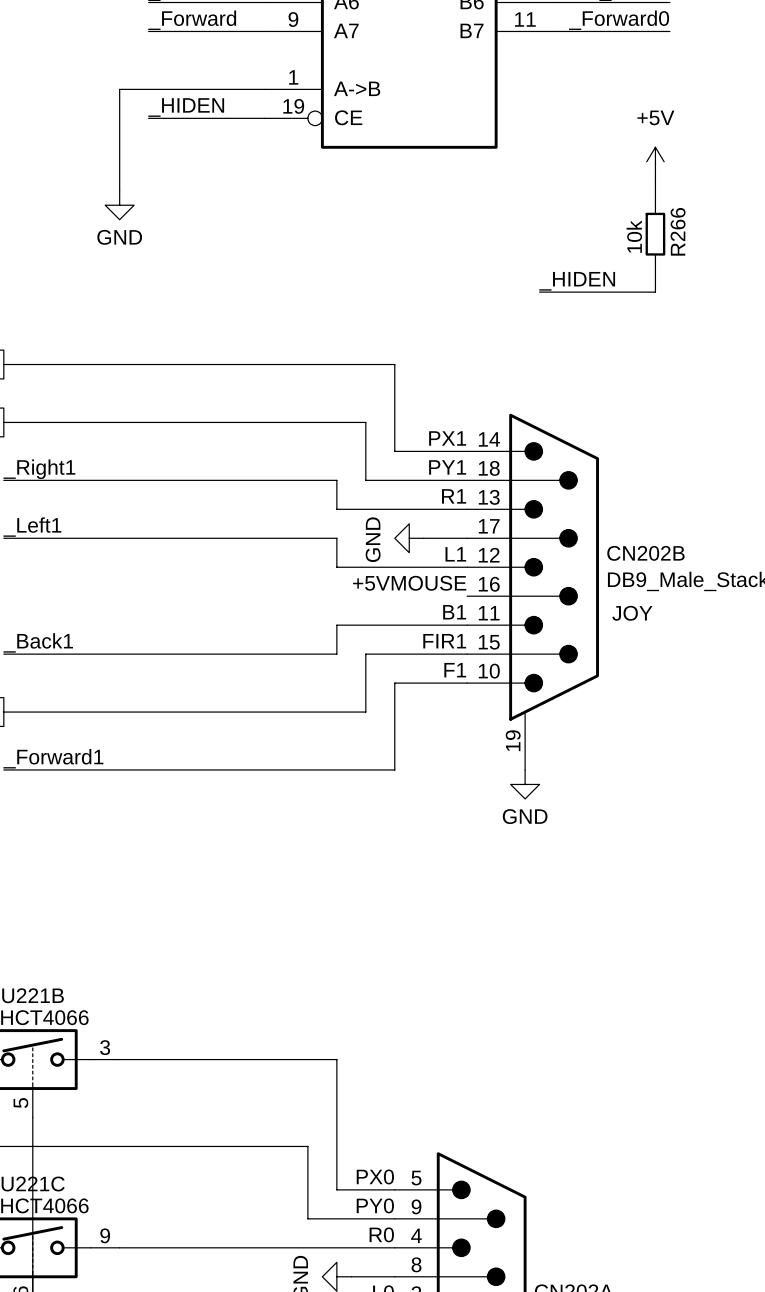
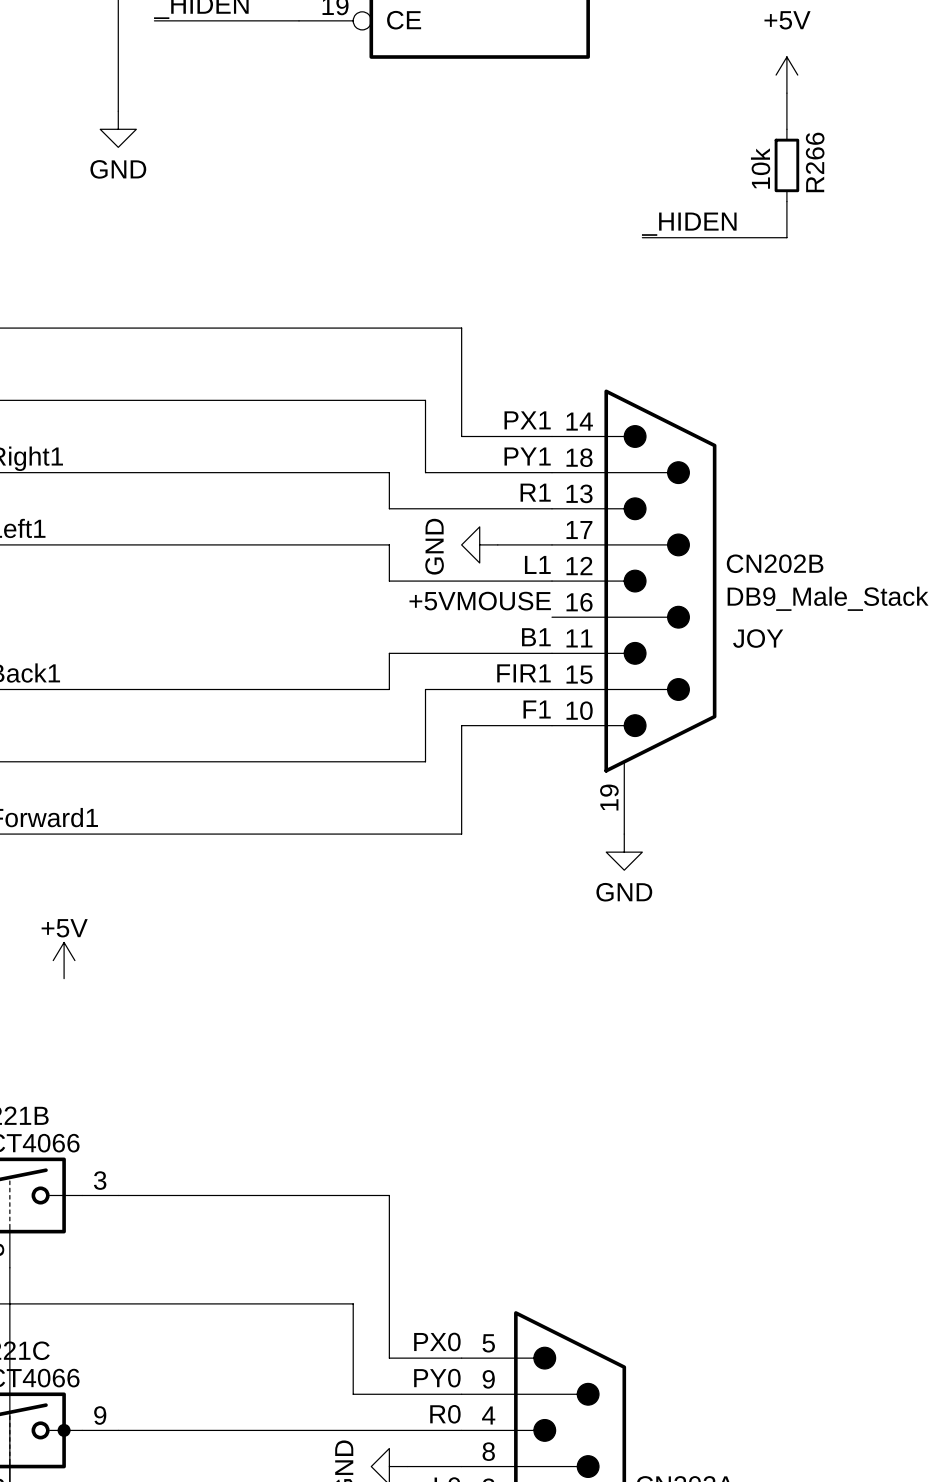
power symbol: none -> +5V (64, 960)
junction: none -> (64, 1430)

